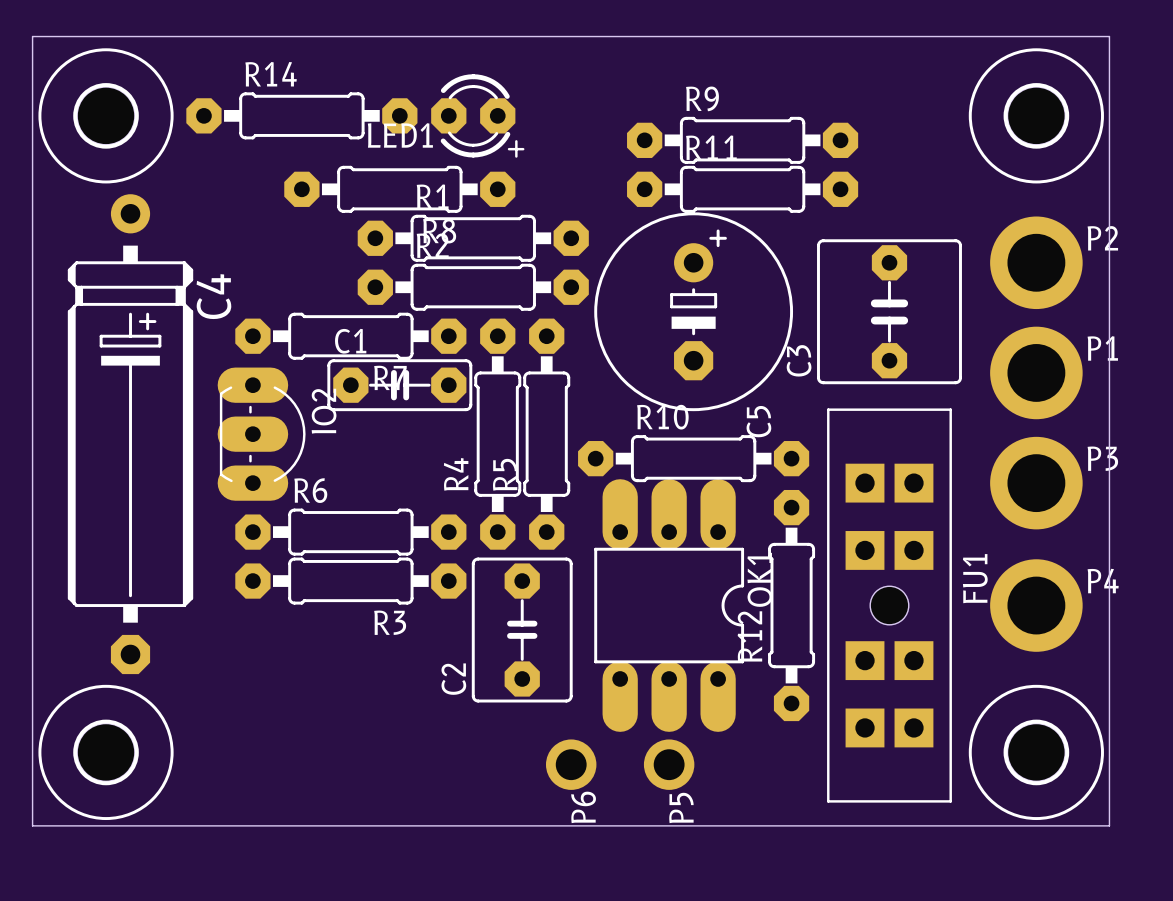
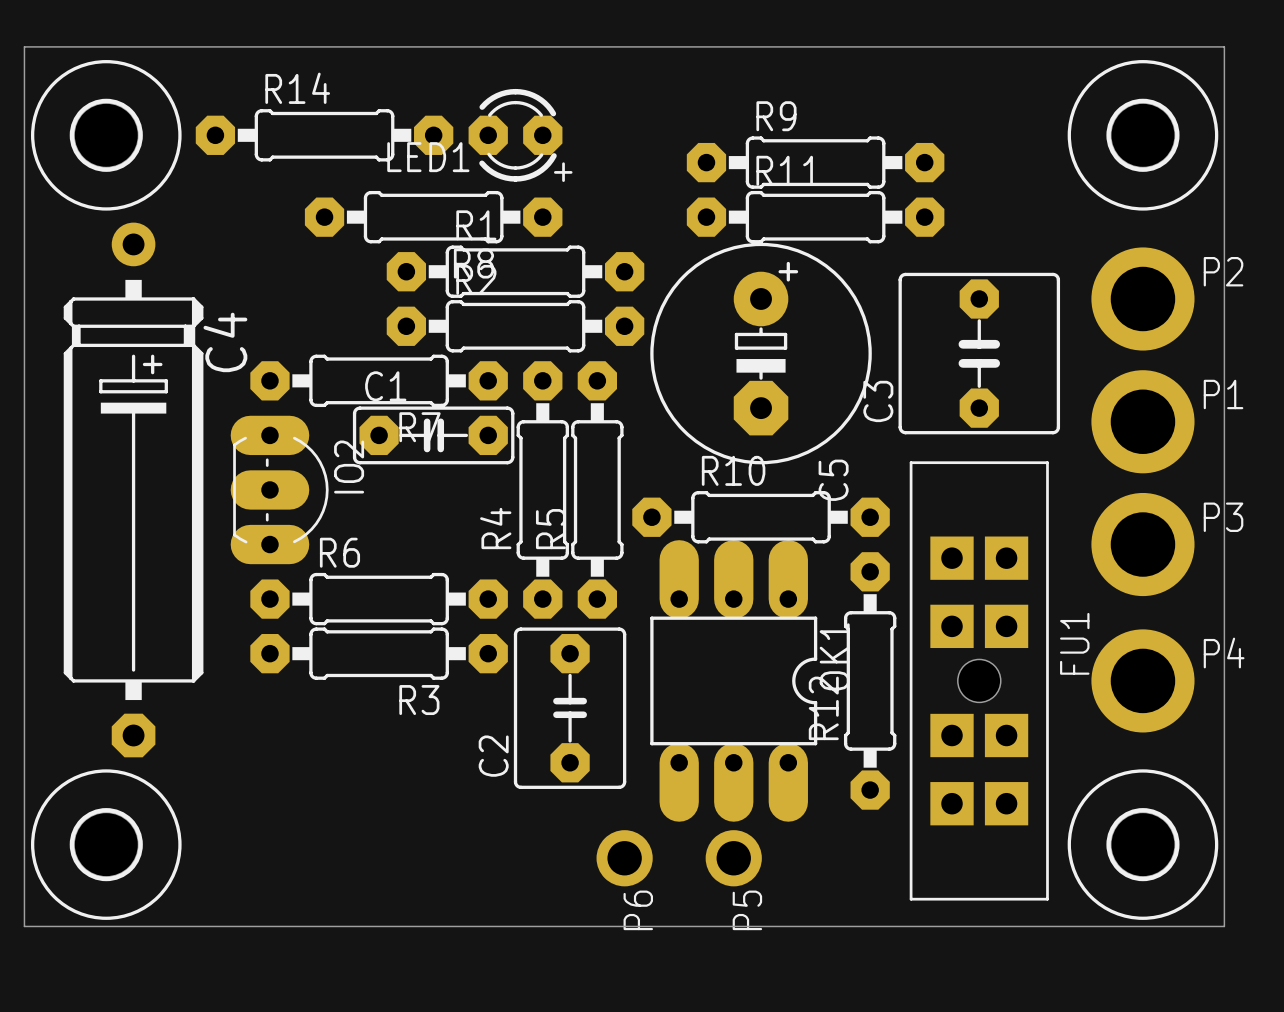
C5 footprint: [594, 212, 794, 412] -> [650, 242, 872, 465]
FU1 footprint: [827, 408, 952, 803] -> [909, 461, 1049, 901]

